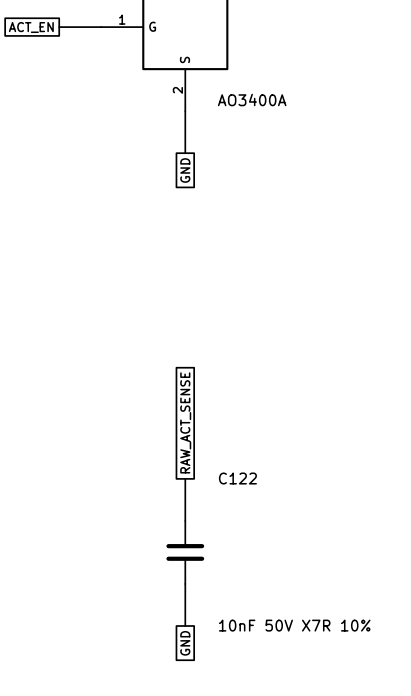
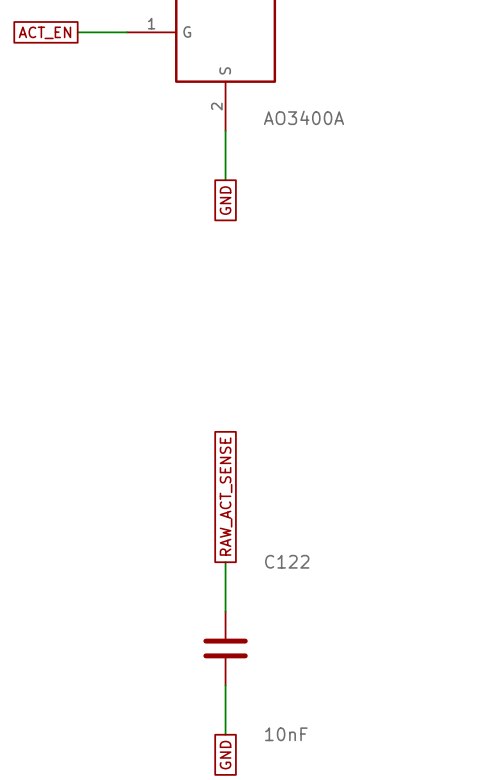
C122 value: 10nF 50V X7R 10% (294, 625) -> 10nF (286, 734)

